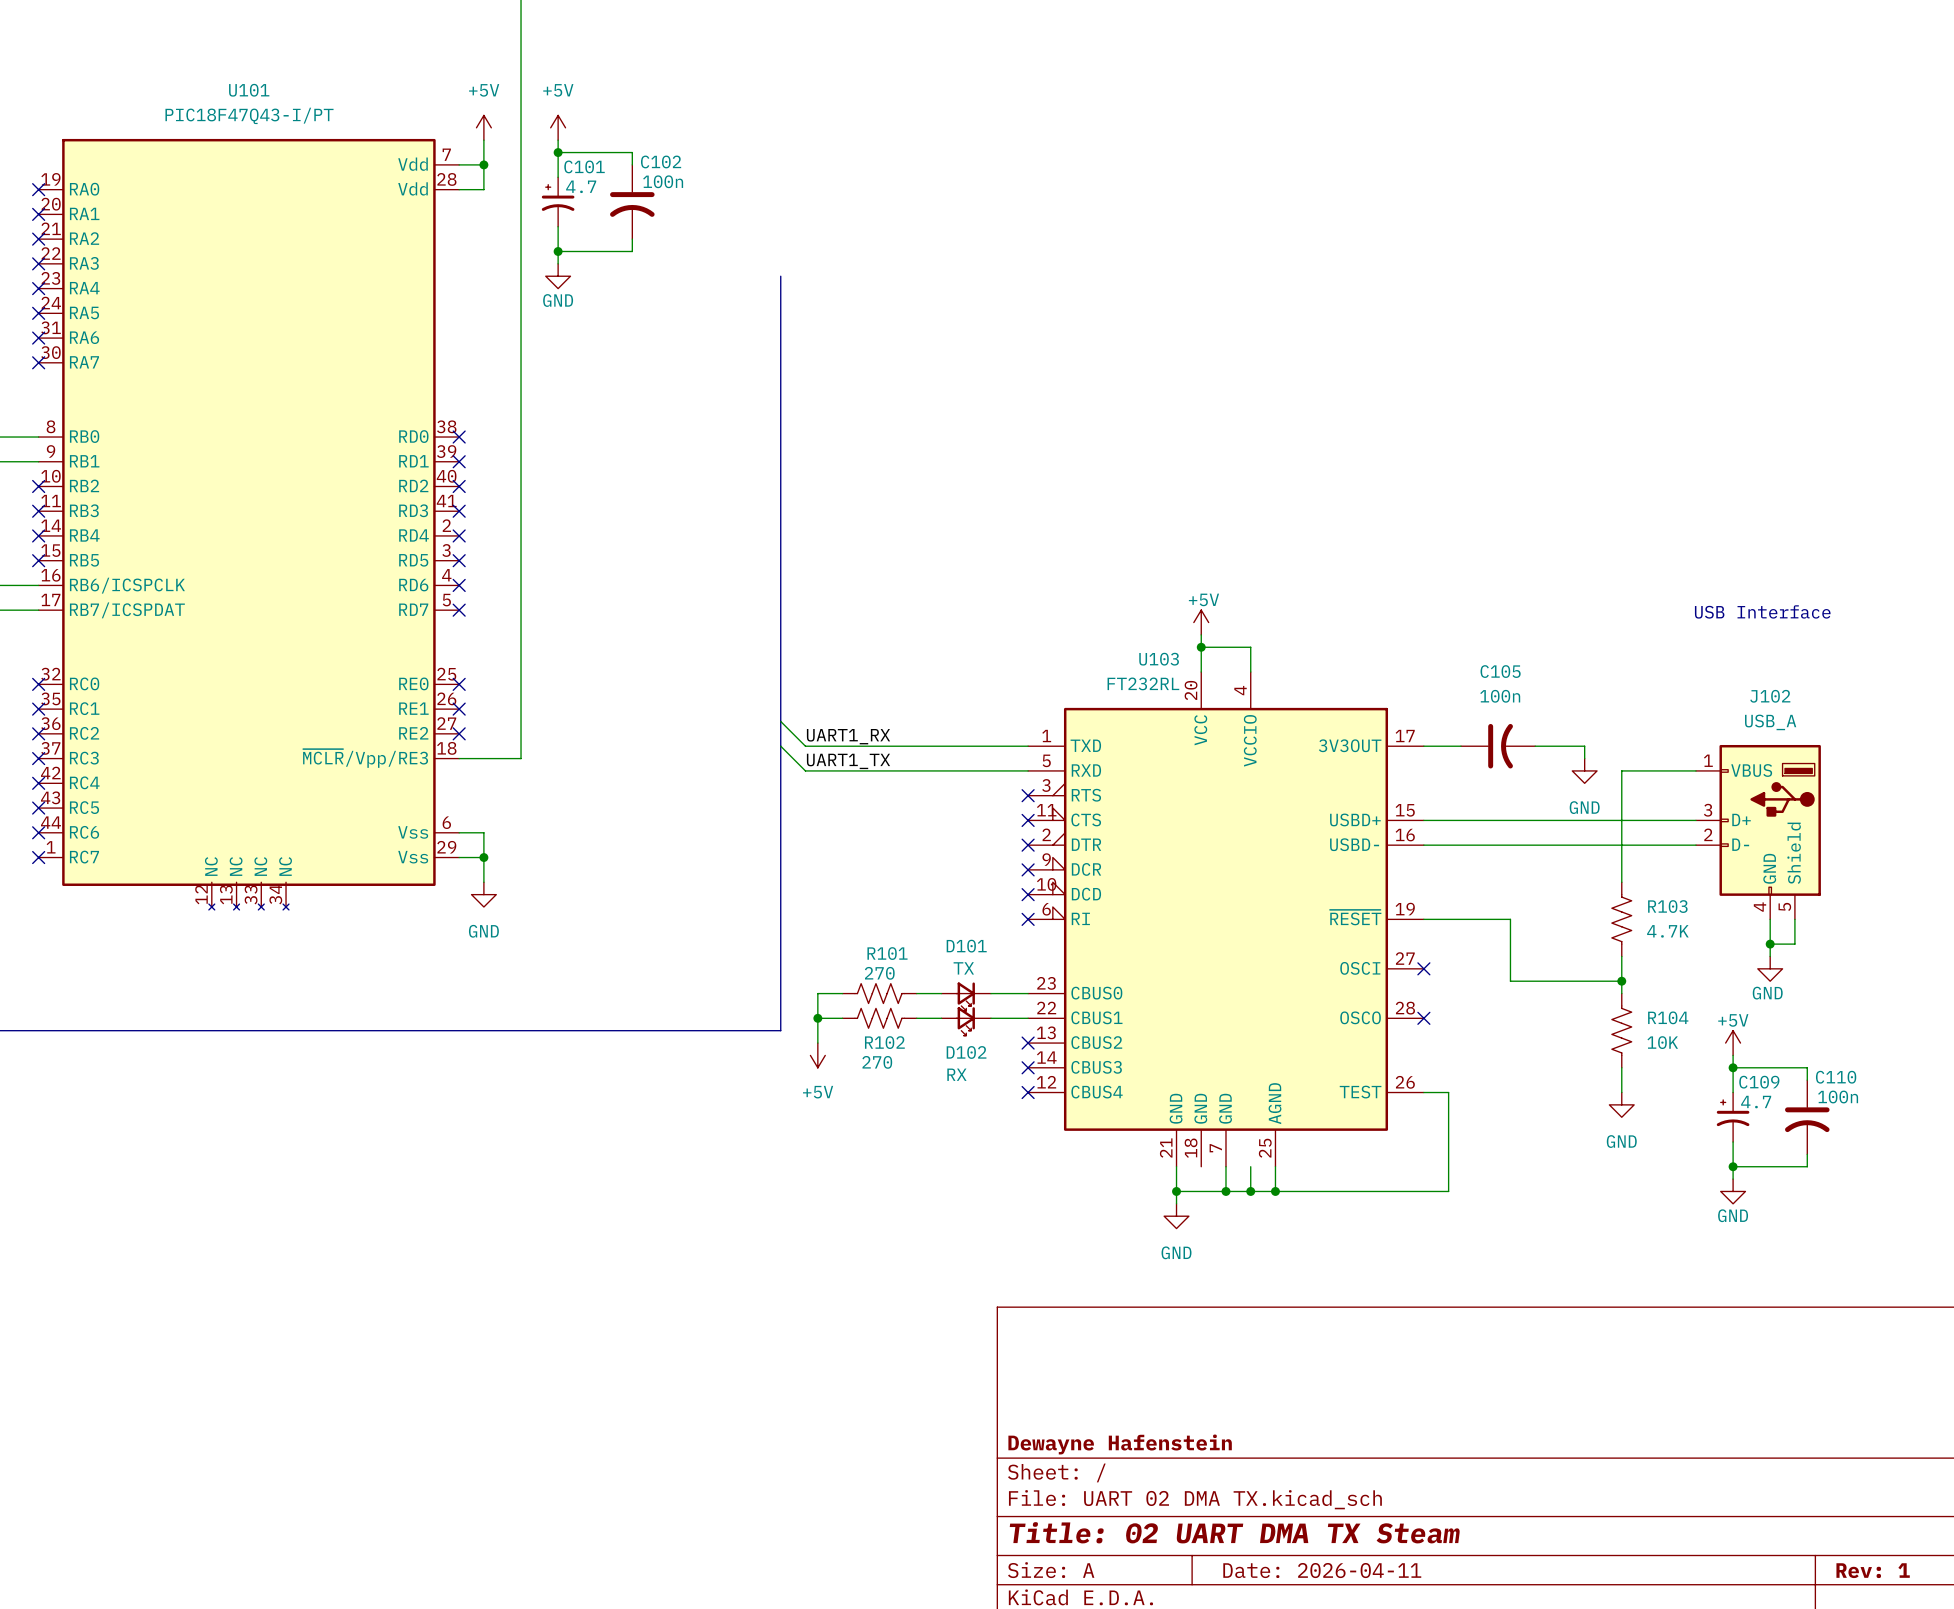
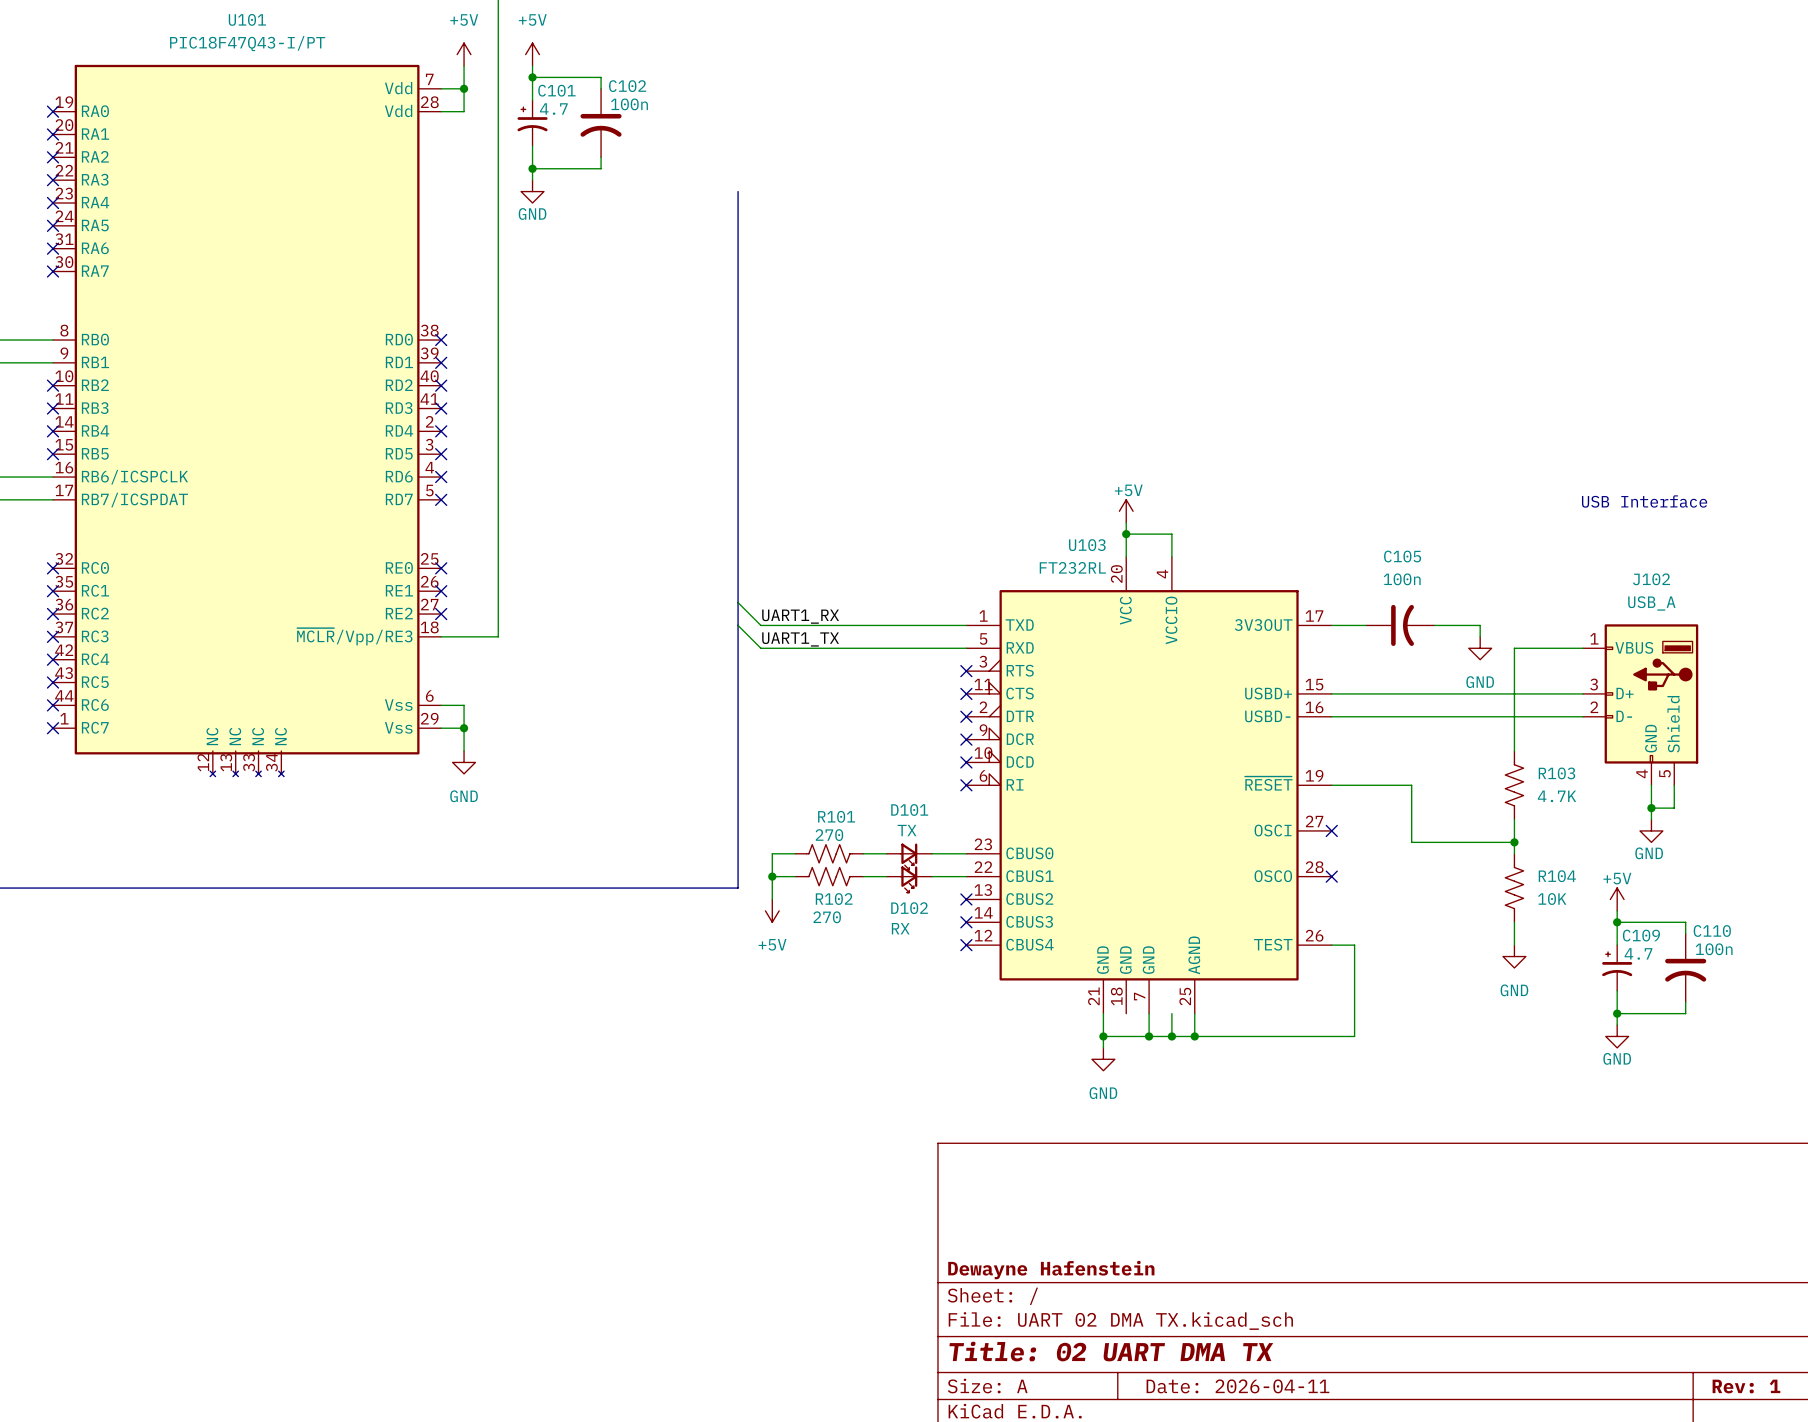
title block: Title: 02 UART DMA TX Steam (1234, 1532) -> Title: 02 UART DMA TX (1111, 1351)

